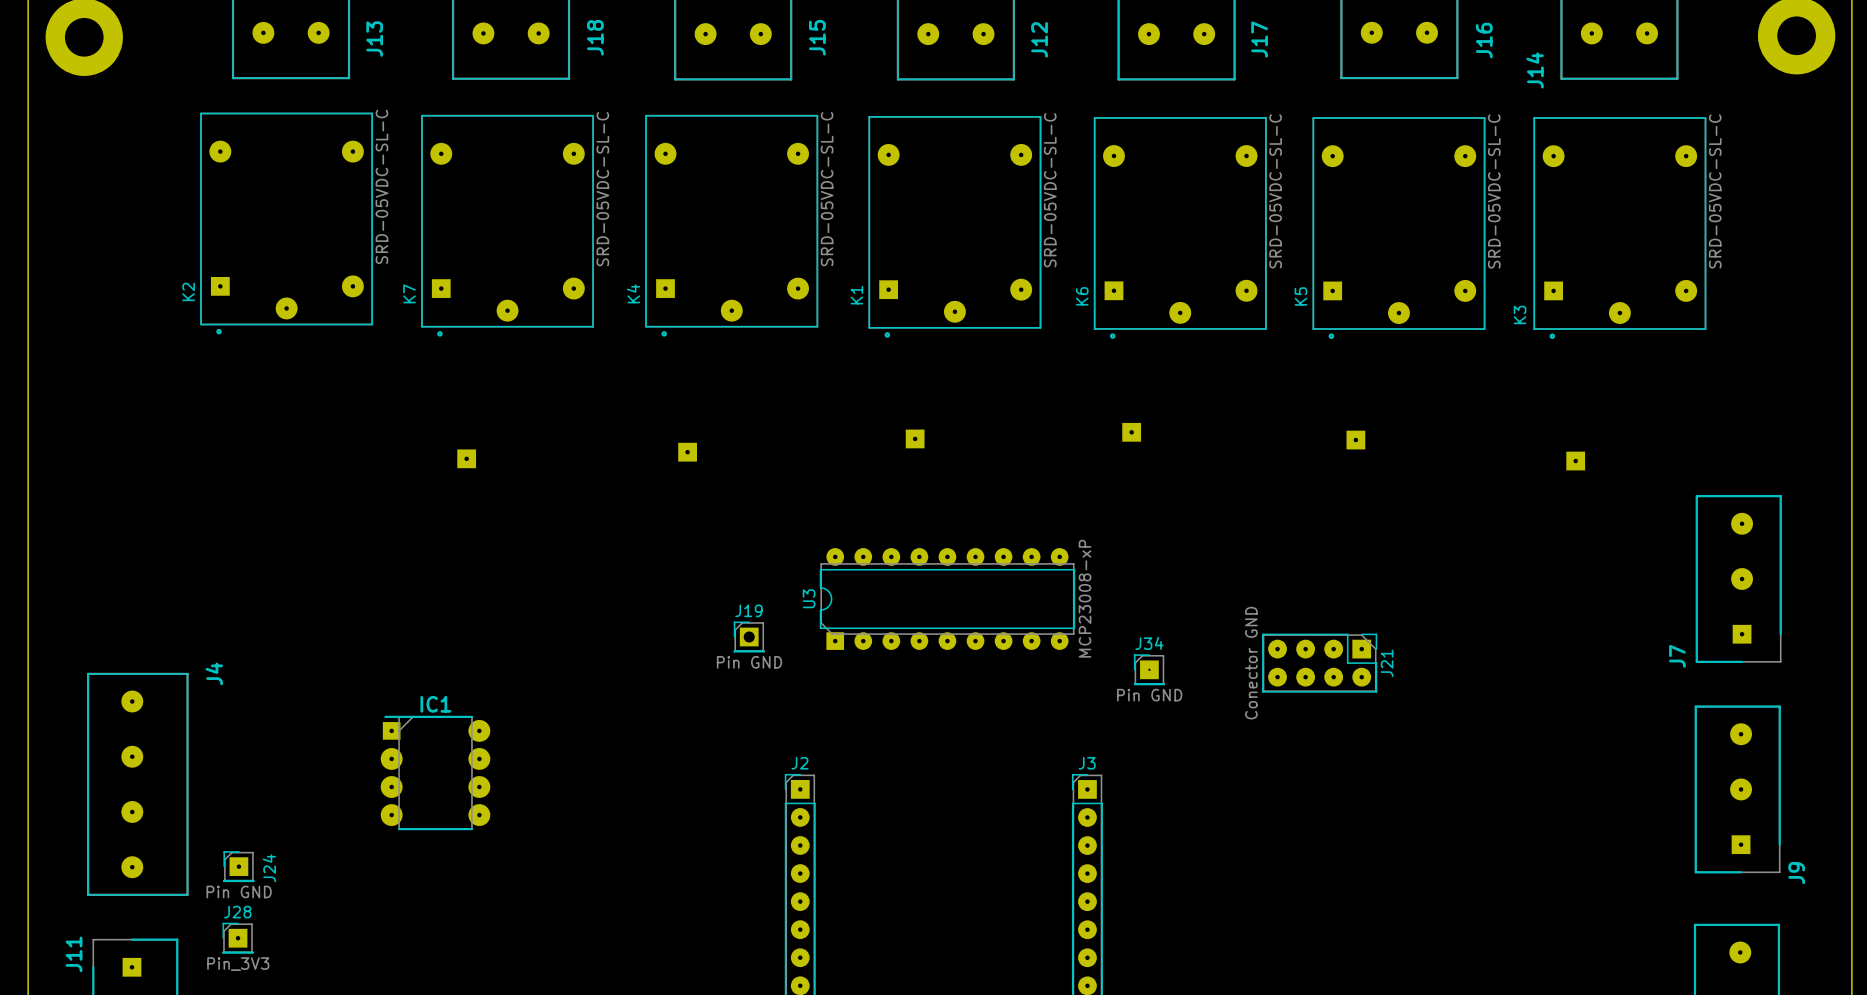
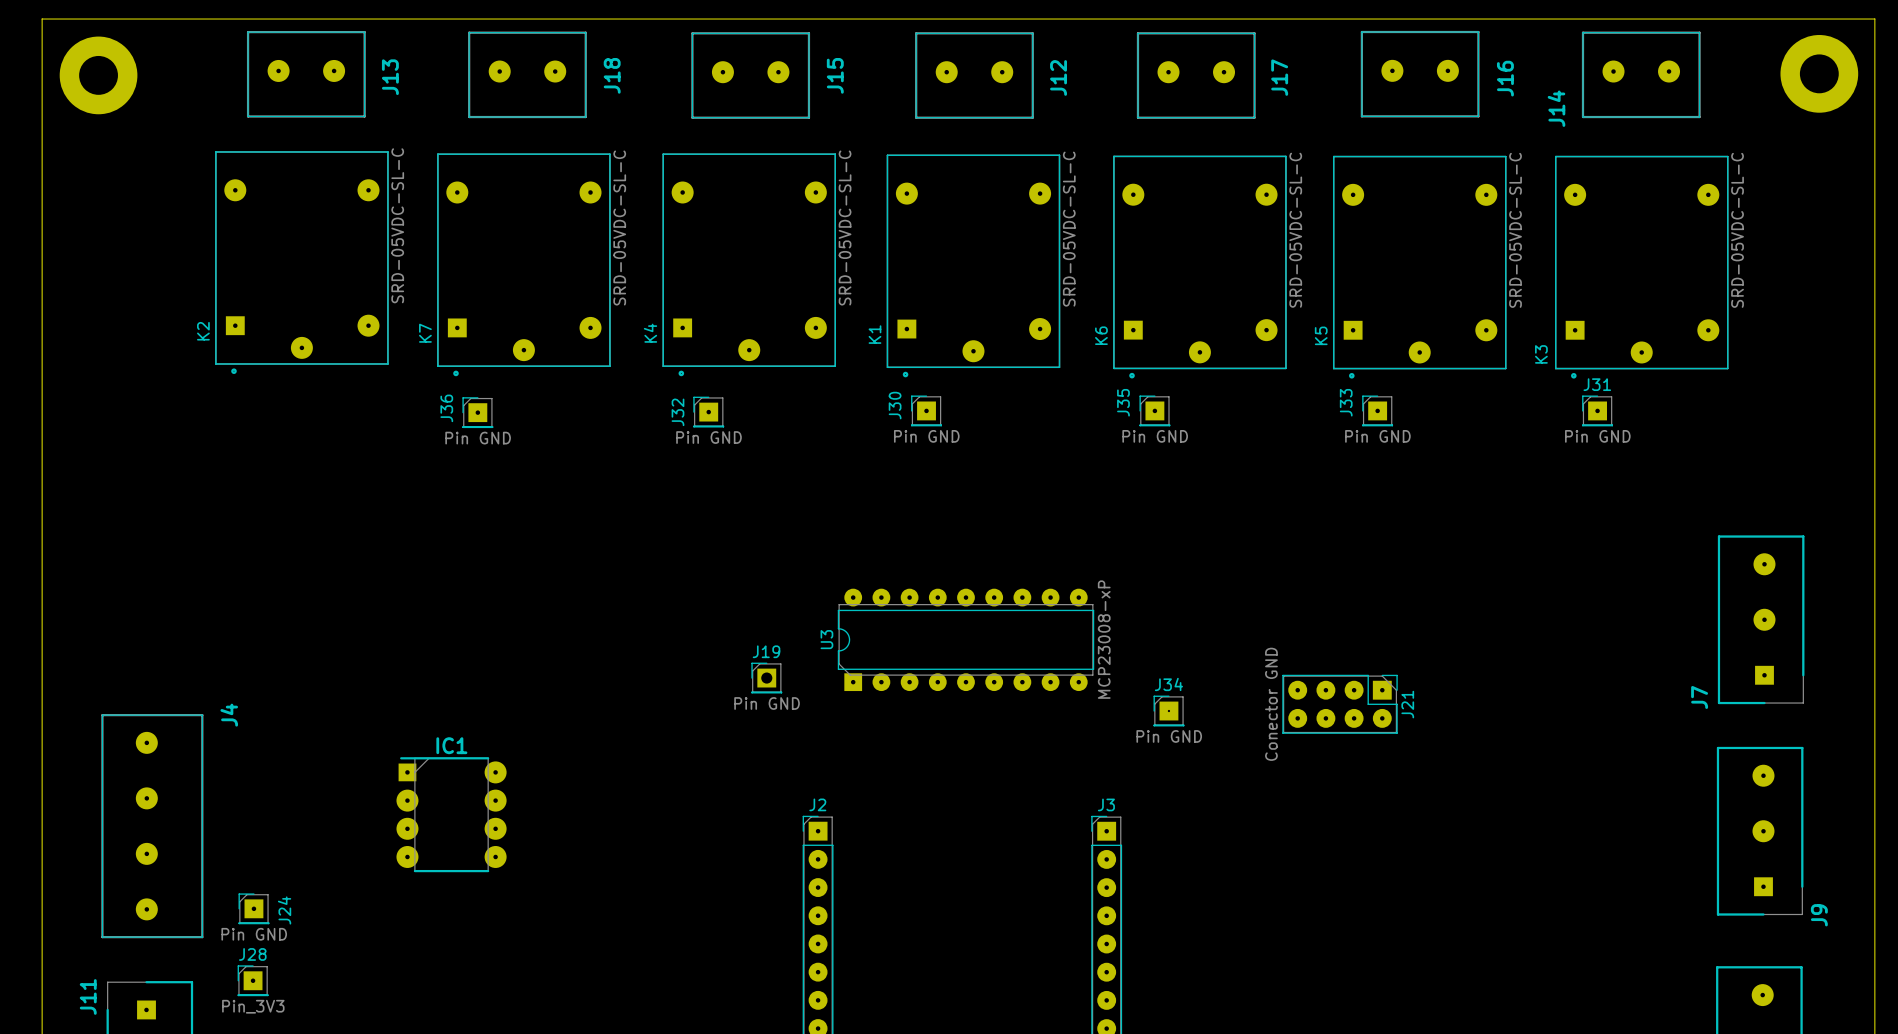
J35 side: bottom (1131, 432) -> top (1154, 410)
J30 side: bottom (915, 438) -> top (926, 410)
J33 side: bottom (1355, 440) -> top (1377, 410)
J32 side: bottom (687, 452) -> top (708, 412)
J36 side: bottom (466, 458) -> top (477, 412)
J31 side: bottom (1575, 461) -> top (1597, 410)

